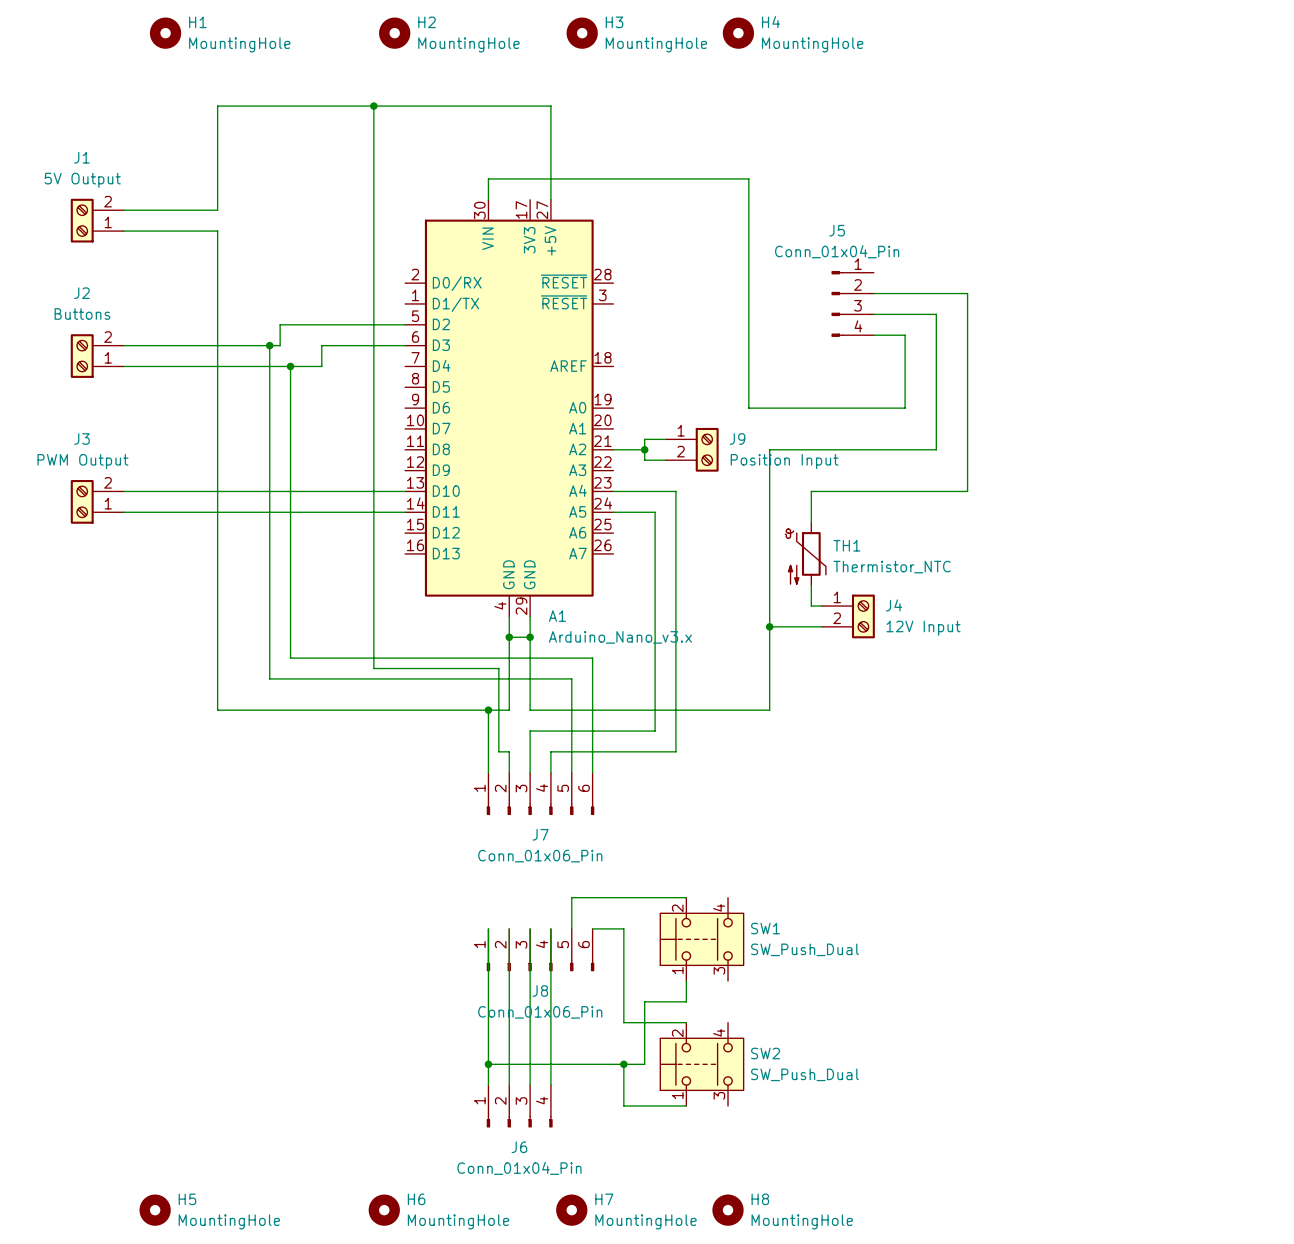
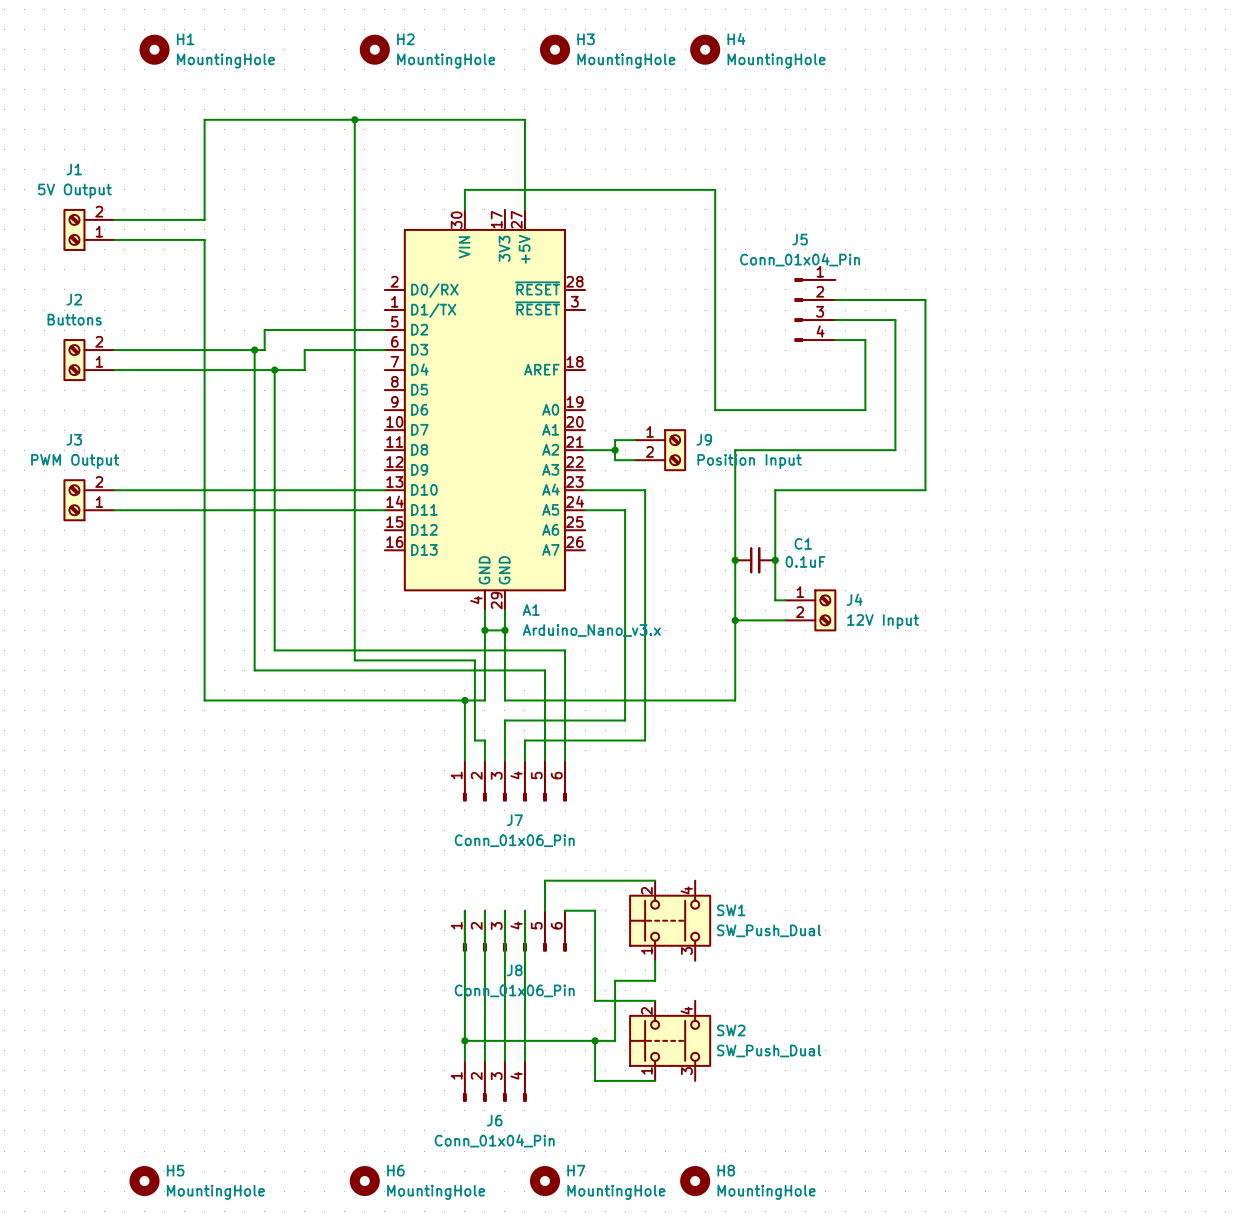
wire: none -> (775, 520) (775, 580)
TH1: Thermistor_NTC (805, 553) -> none
junction: none -> (735, 560)
C1: none -> 0.1uF (755, 560)
junction: none -> (775, 560)

